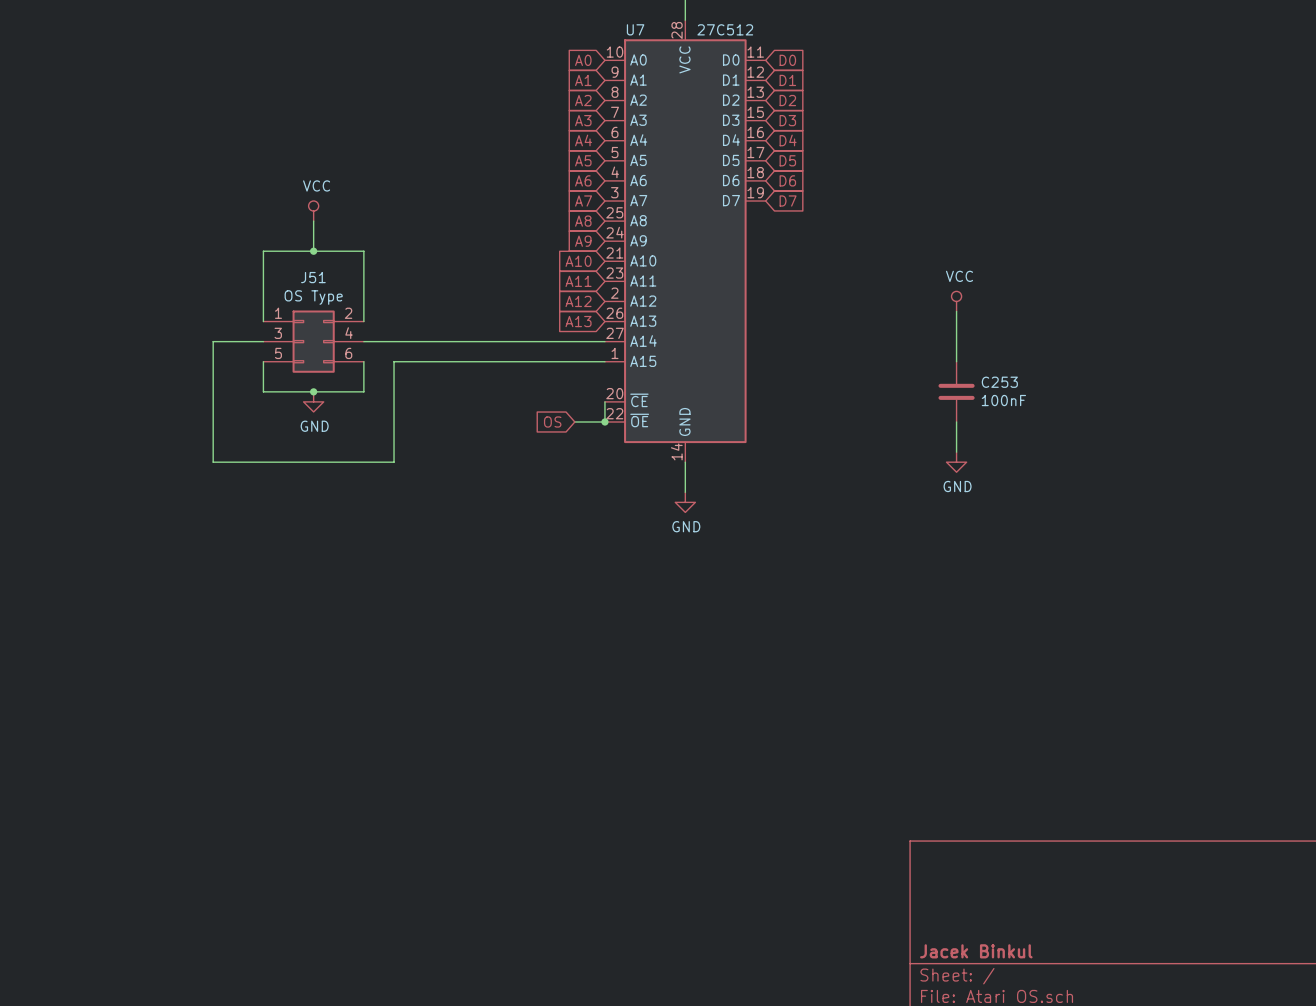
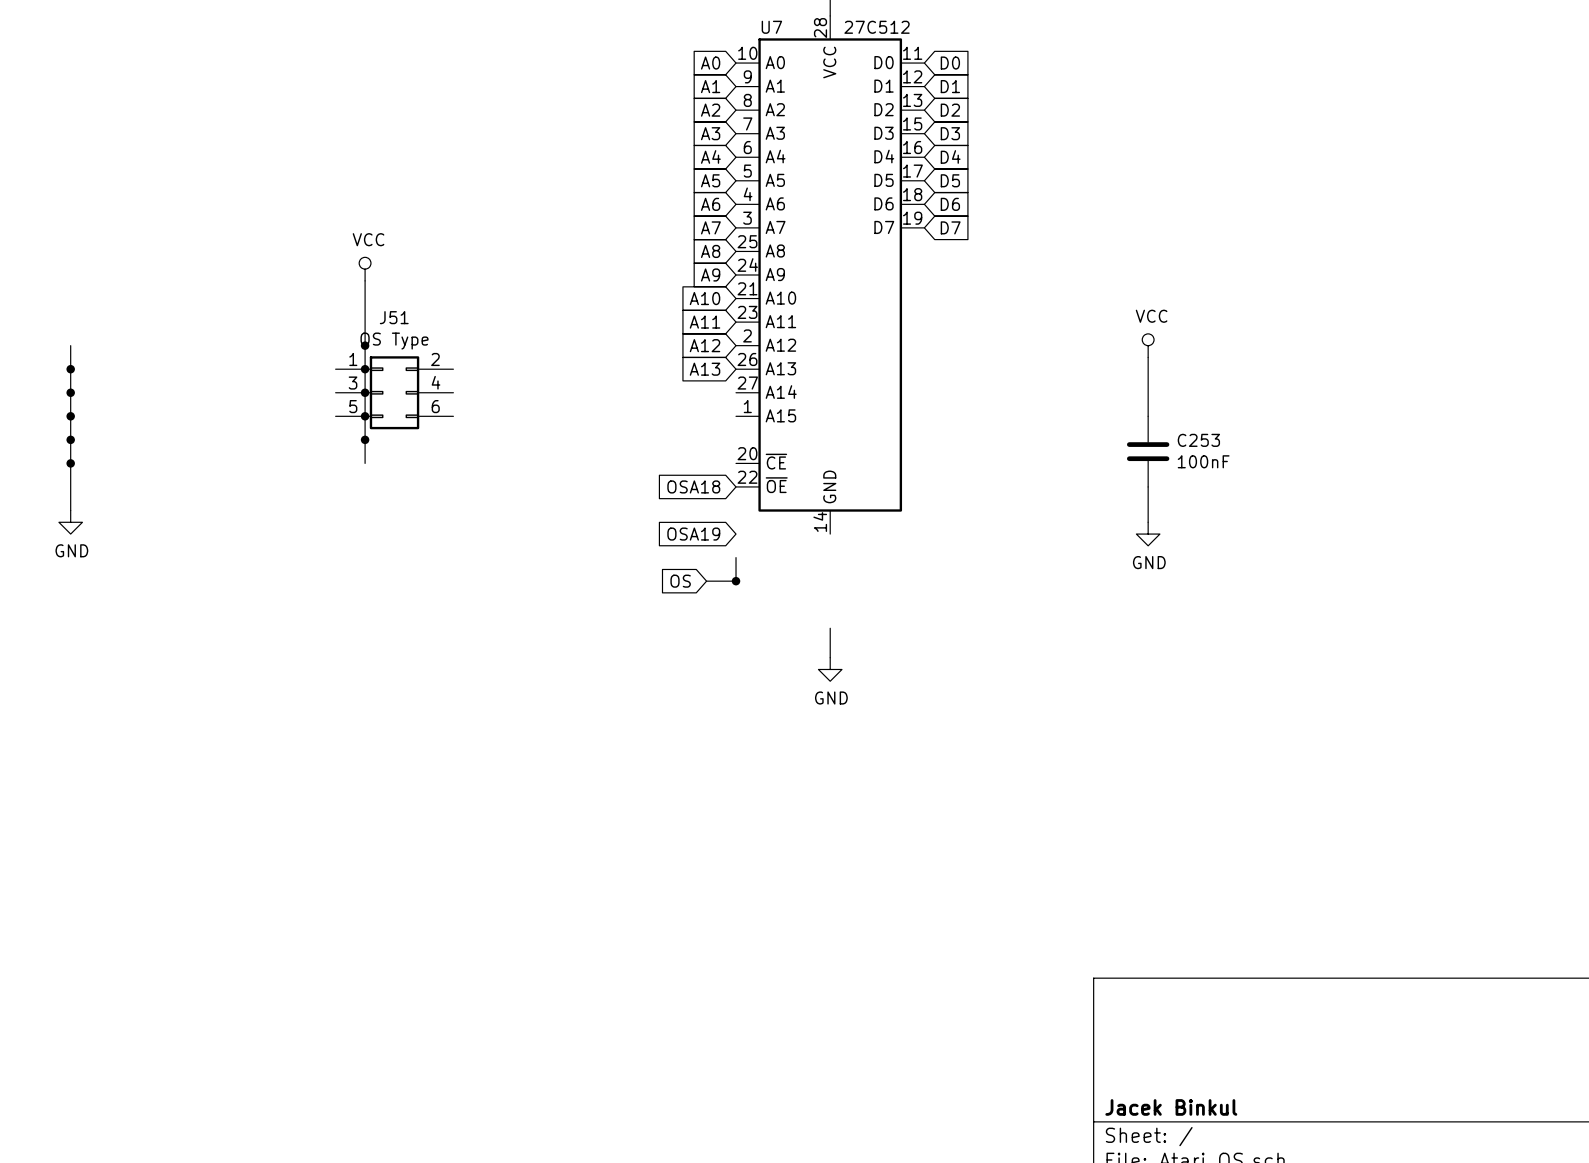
power symbol position: VCC (313, 211) -> VCC (365, 269)
wire: (313, 221) (313, 251) -> none
wire: none -> (365, 280) (365, 463)
junction: (313, 251) -> none
wire: none -> (70, 345) (70, 510)
junction: none -> (365, 345)
junction: none -> (70, 369)
wire: (263, 321) (263, 251) (363, 251) (363, 321) -> none
junction: none -> (365, 369)
junction: none -> (70, 392)
wire: (263, 341) (213, 341) (213, 462) (394, 462) (394, 361) (604, 361) -> none
junction: none -> (365, 392)
wire: (363, 341) (604, 341) -> none
junction: none -> (70, 416)
wire: (263, 361) (263, 391) (363, 391) (363, 361) -> none
junction: none -> (365, 416)
junction: none -> (70, 439)
junction: none -> (365, 439)
junction: (313, 391) -> none
junction: none -> (70, 463)
power symbol: GND (313, 401) -> none
wire: (604, 401) (604, 422) (574, 422) -> none
global label position: OS (552, 422) -> OS (680, 581)
global label: none -> OSA18 (693, 486)
junction: (604, 422) -> none
power symbol: none -> GND (70, 522)
global label: none -> OSA19 (693, 534)
wire: (685, 462) (685, 492) -> none
wire: none -> (736, 557) (736, 581) (706, 581)
junction: none -> (736, 581)
power symbol position: GND (685, 502) -> GND (830, 669)
wire: none -> (830, 628) (830, 657)

